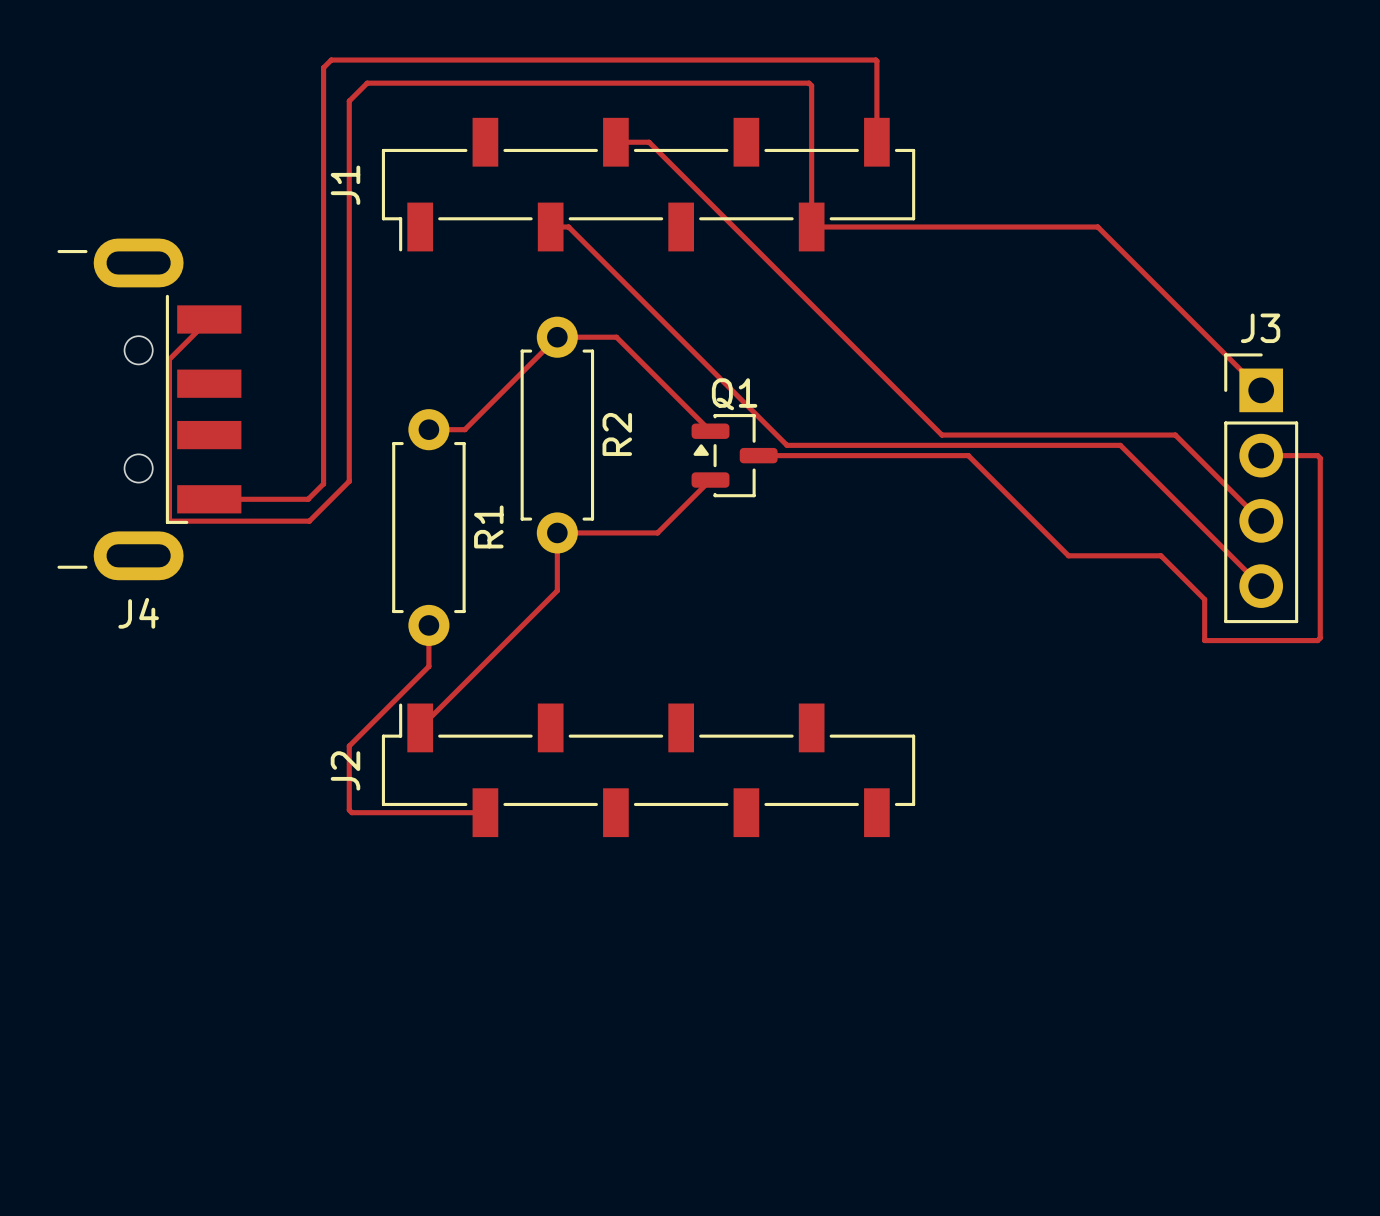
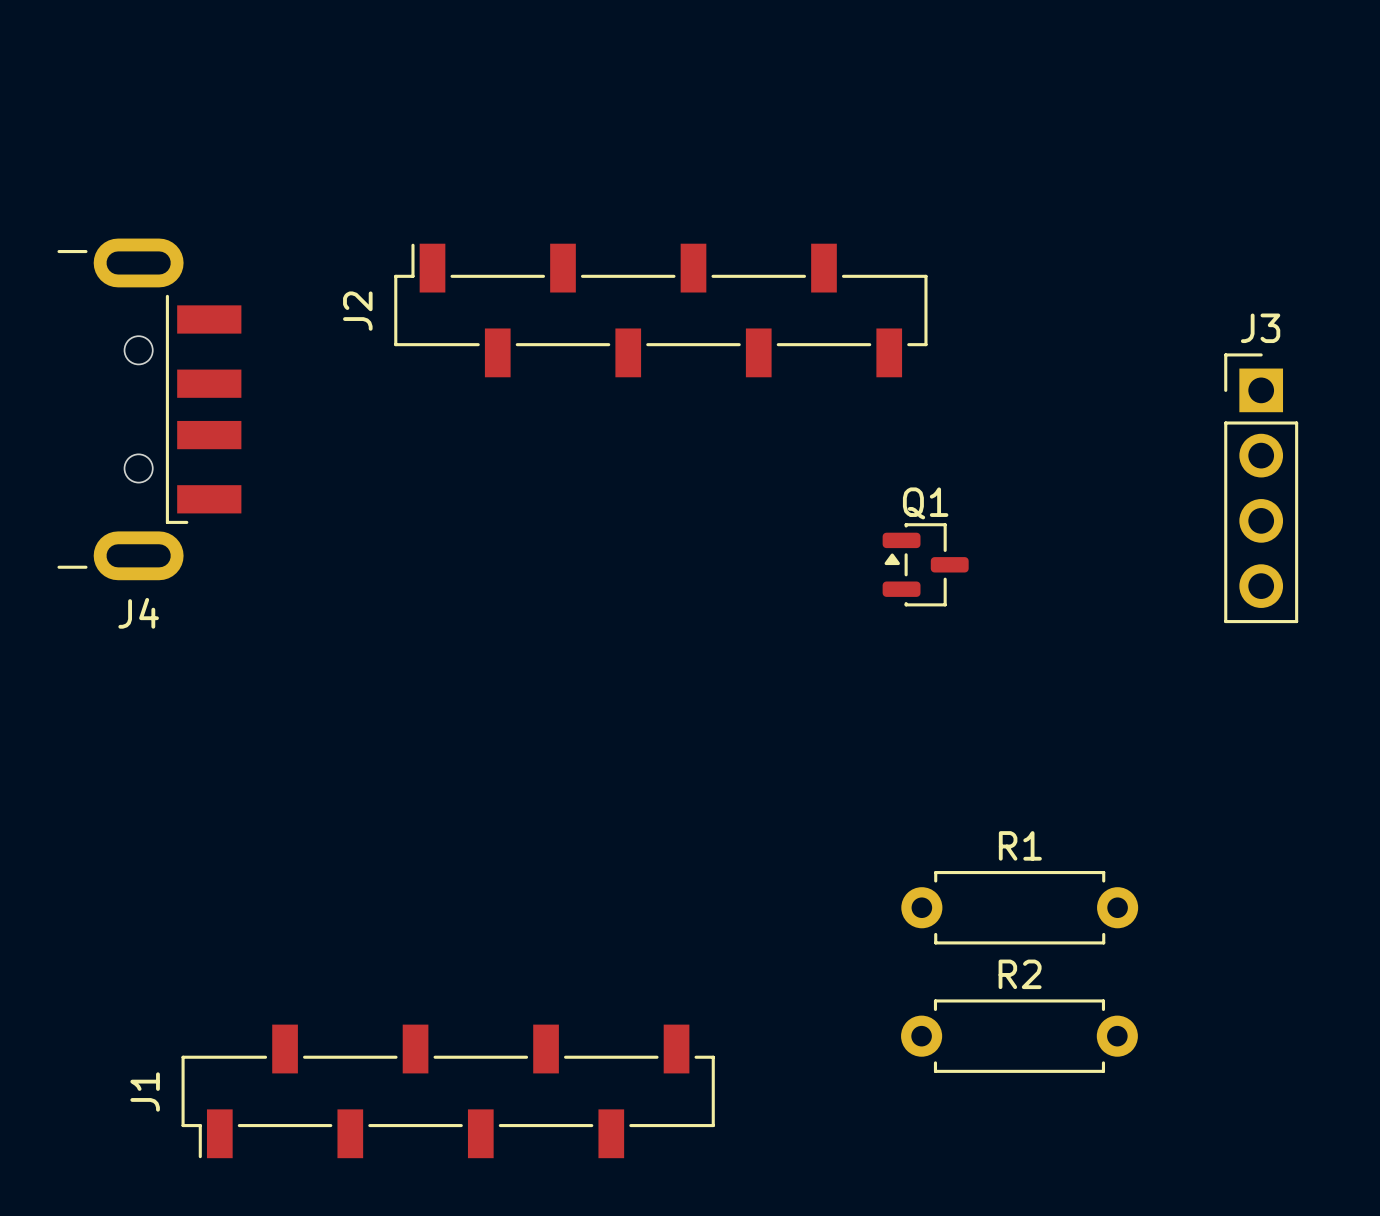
top track: (615, 142) (649, 142) (941, 435) (1175, 435) (1261, 520) -> none
top track: (876, 142) (875, 60) (331, 60) (323, 67) (323, 483) (308, 499) (209, 499) -> none
J1 position: (648, 184) -> (448, 1091)
top track: (550, 227) (568, 227) (787, 445) (1120, 445) (1261, 586) -> none
top track: (209, 319) (169, 359) (169, 521) (309, 521) (349, 481) (349, 101) (367, 83) (809, 83) (811, 85) (811, 227) (1097, 227) (1261, 390) -> none
top track: (428, 429) (464, 429) (557, 337) (616, 337) (710, 431) -> none
R2 name position: R2 (617, 434) -> R2 (1020, 974)
R2 rotation: 0° (557, 435) -> 90° clockwise (1019, 1036)
R2 position: (557, 435) -> (1019, 1036)
Q1 position: (734, 455) -> (925, 564)
top track: (758, 455) (968, 455) (1068, 555) (1161, 555) (1204, 599) (1204, 640) (1317, 640) (1320, 638) (1320, 458) (1317, 455) (1261, 455) -> none
top track: (710, 480) (657, 532) (557, 532) (557, 590) (420, 727) -> none
R1 name position: R1 (488, 526) -> R1 (1020, 845)
R1 rotation: 0° (428, 527) -> 90° clockwise (1019, 907)
R1 position: (428, 527) -> (1019, 907)
top track: (428, 625) (428, 666) (349, 746) (349, 810) (351, 812) (485, 812) -> none
J2 position: (648, 770) -> (660, 310)

